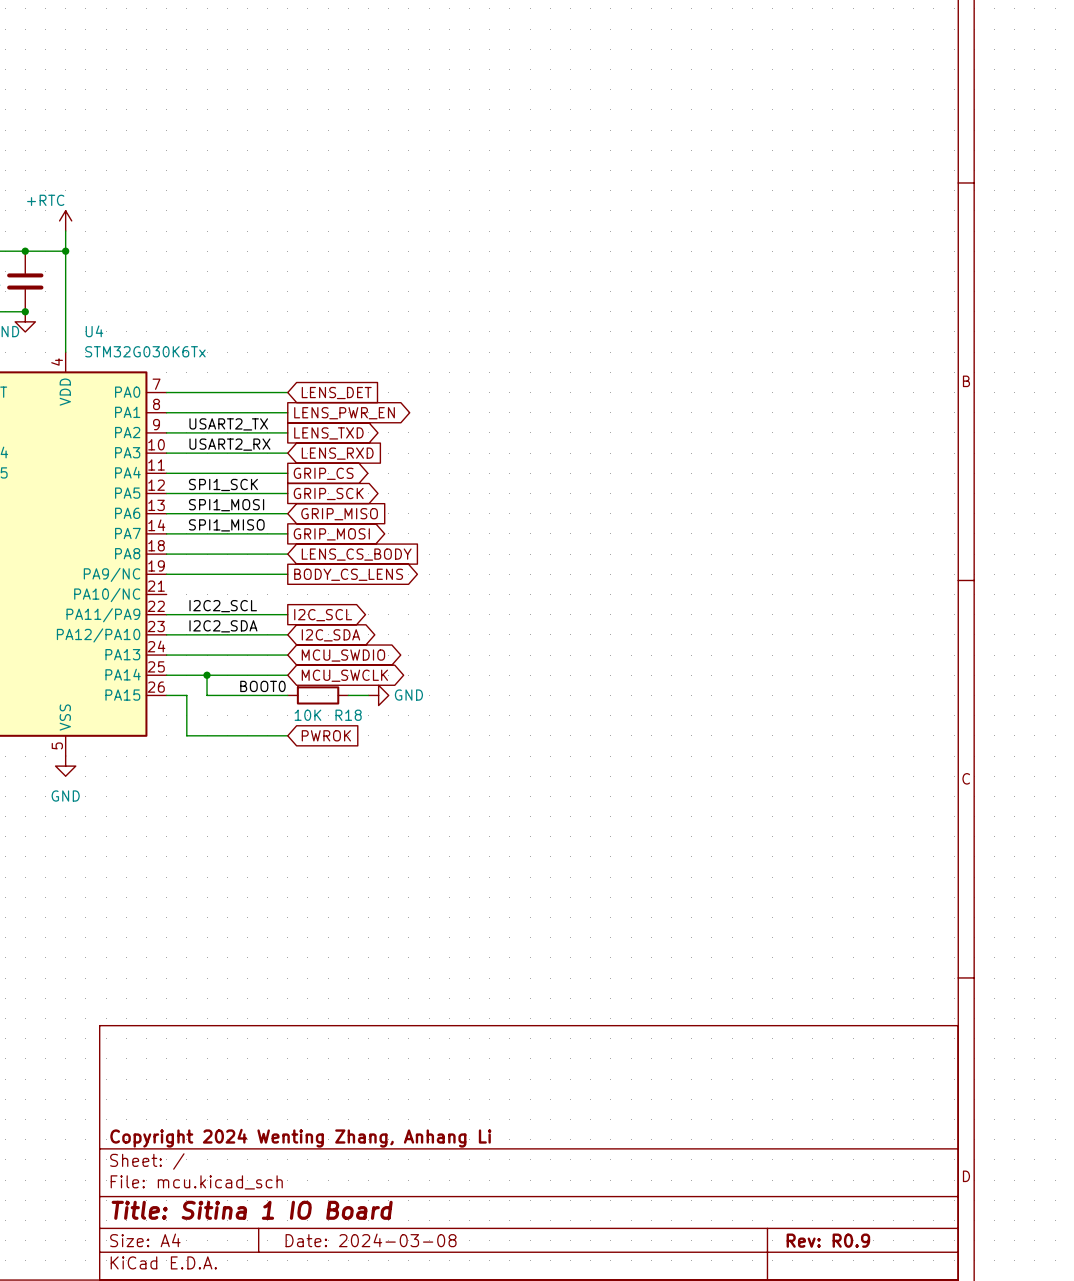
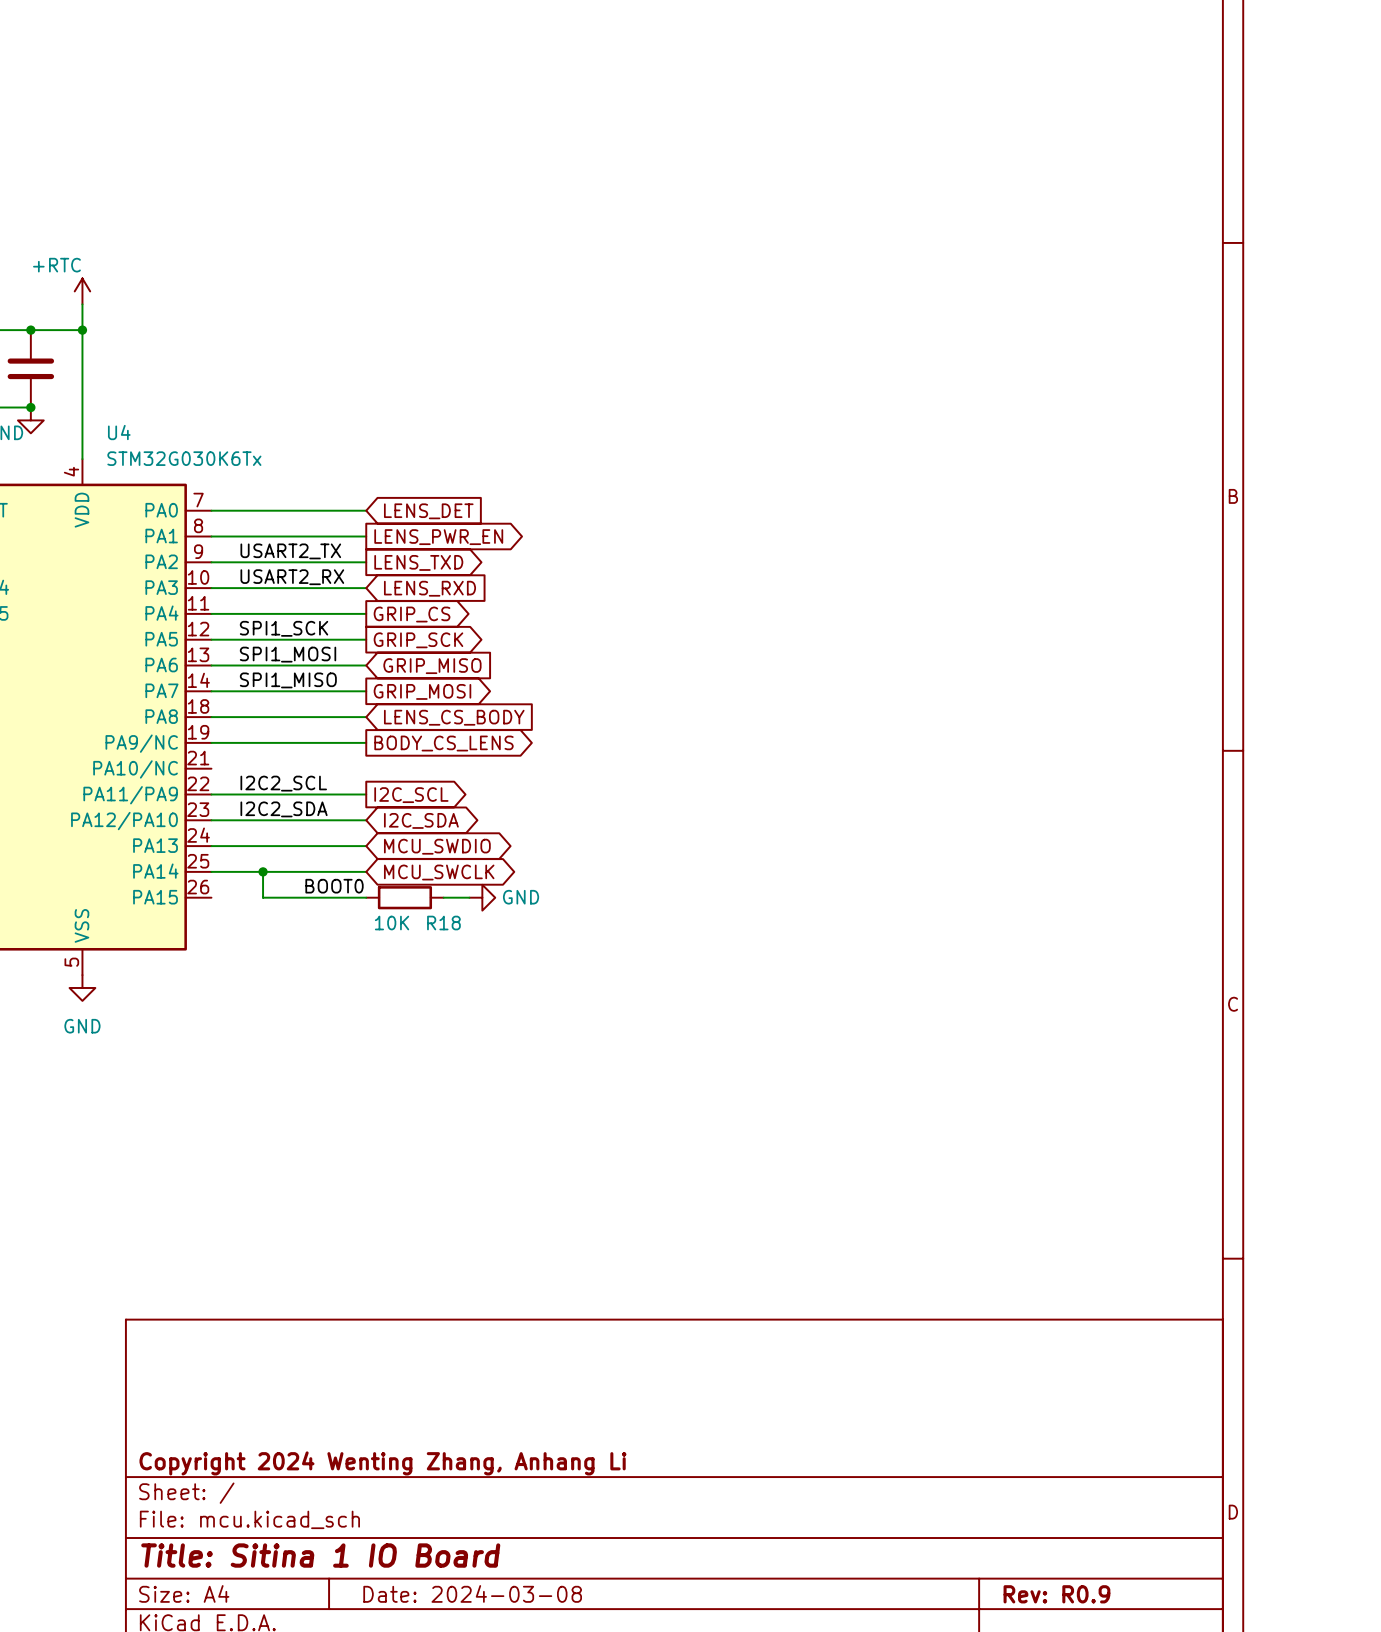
wire: (166, 695) (186, 695) (186, 735) (287, 735) -> none
global label: PWROK (326, 735) -> none

